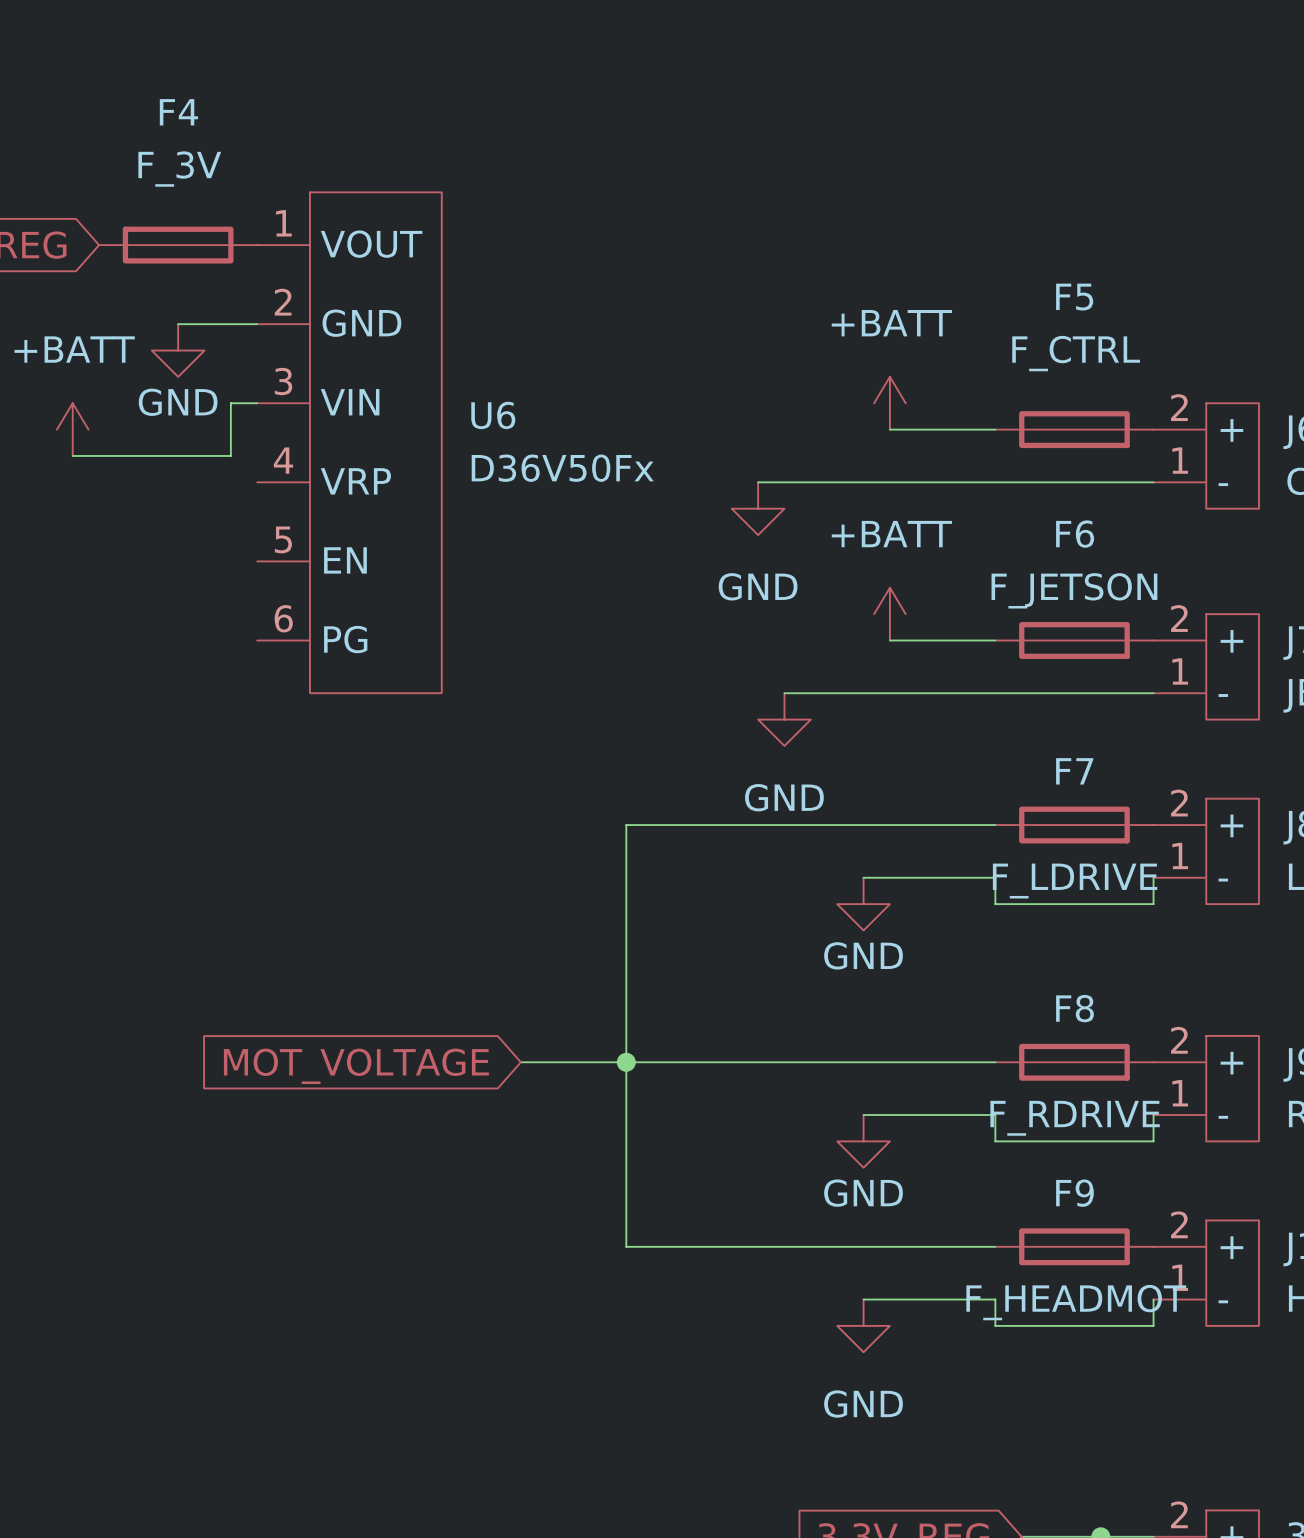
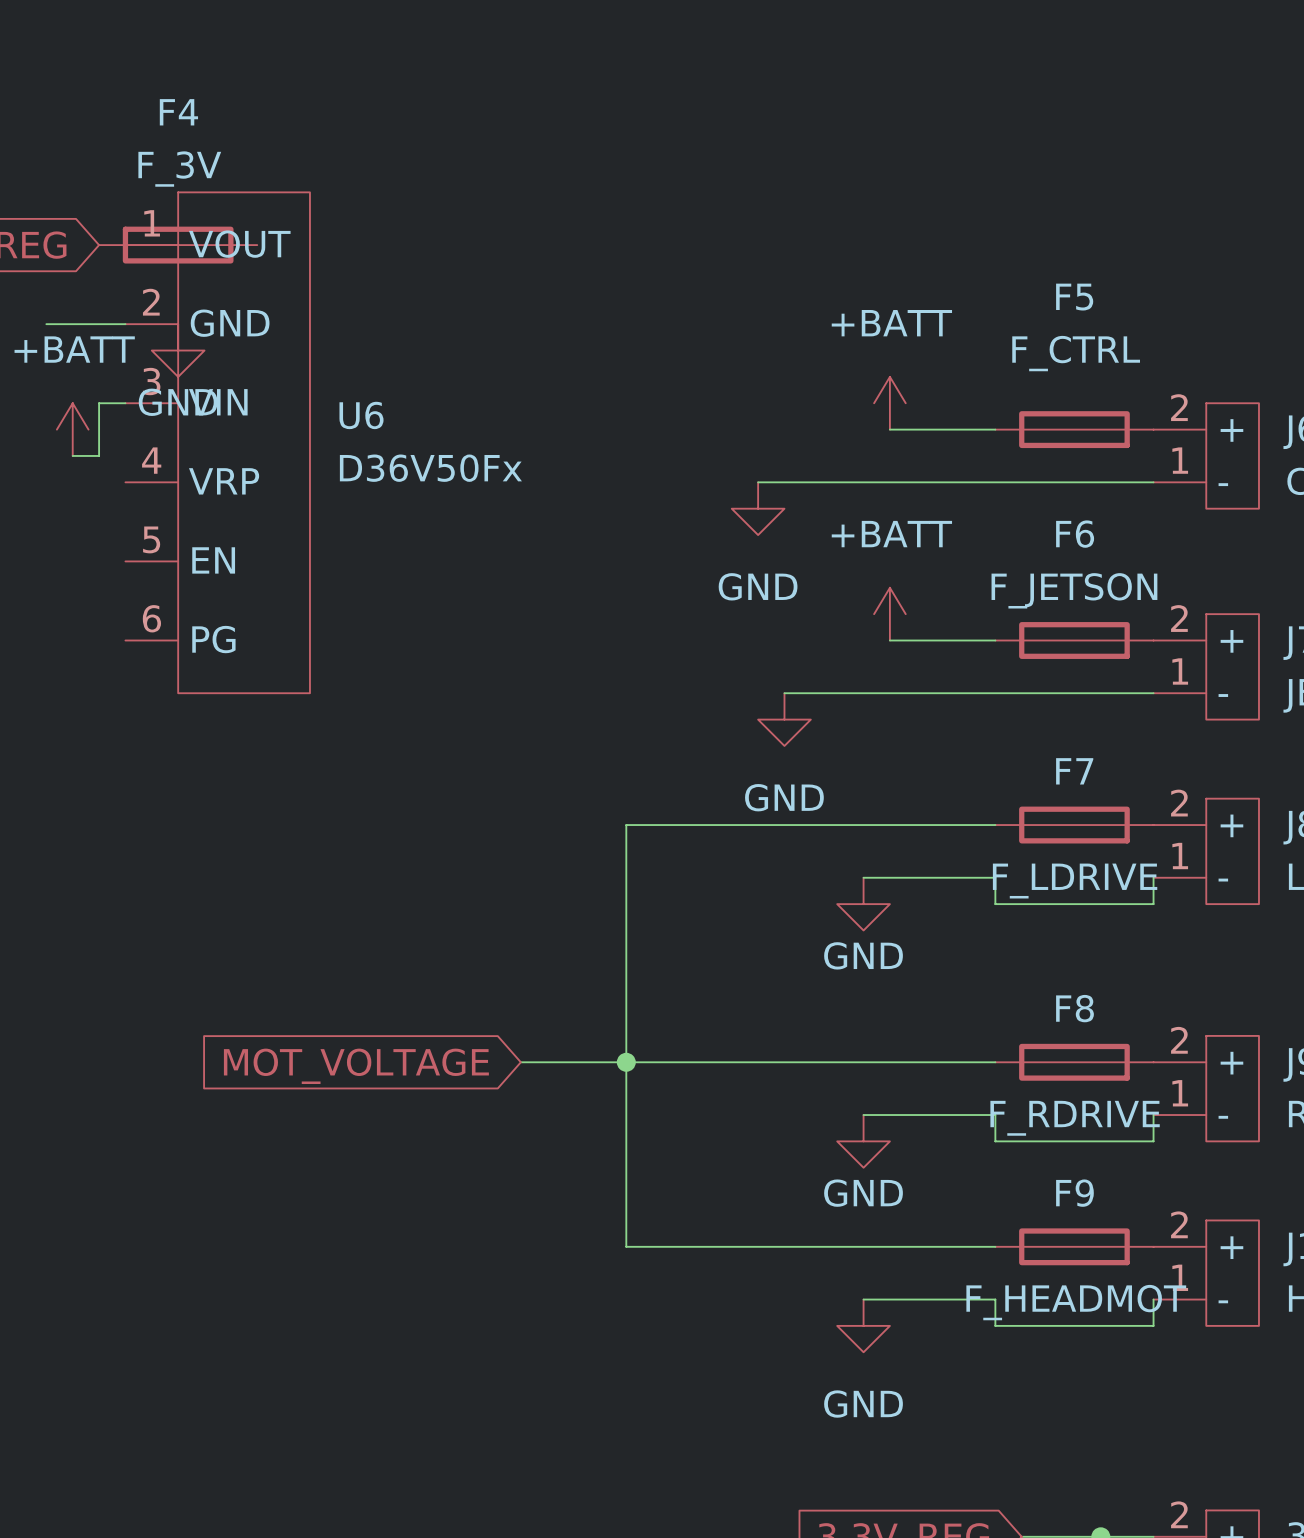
wire: (178, 324) (257, 324) -> (46, 324) (125, 324)
wire: (257, 403) (230, 403) (230, 455) (99, 455) -> (125, 403) (99, 403) (99, 455)
U6 position: (349, 442) -> (217, 442)

